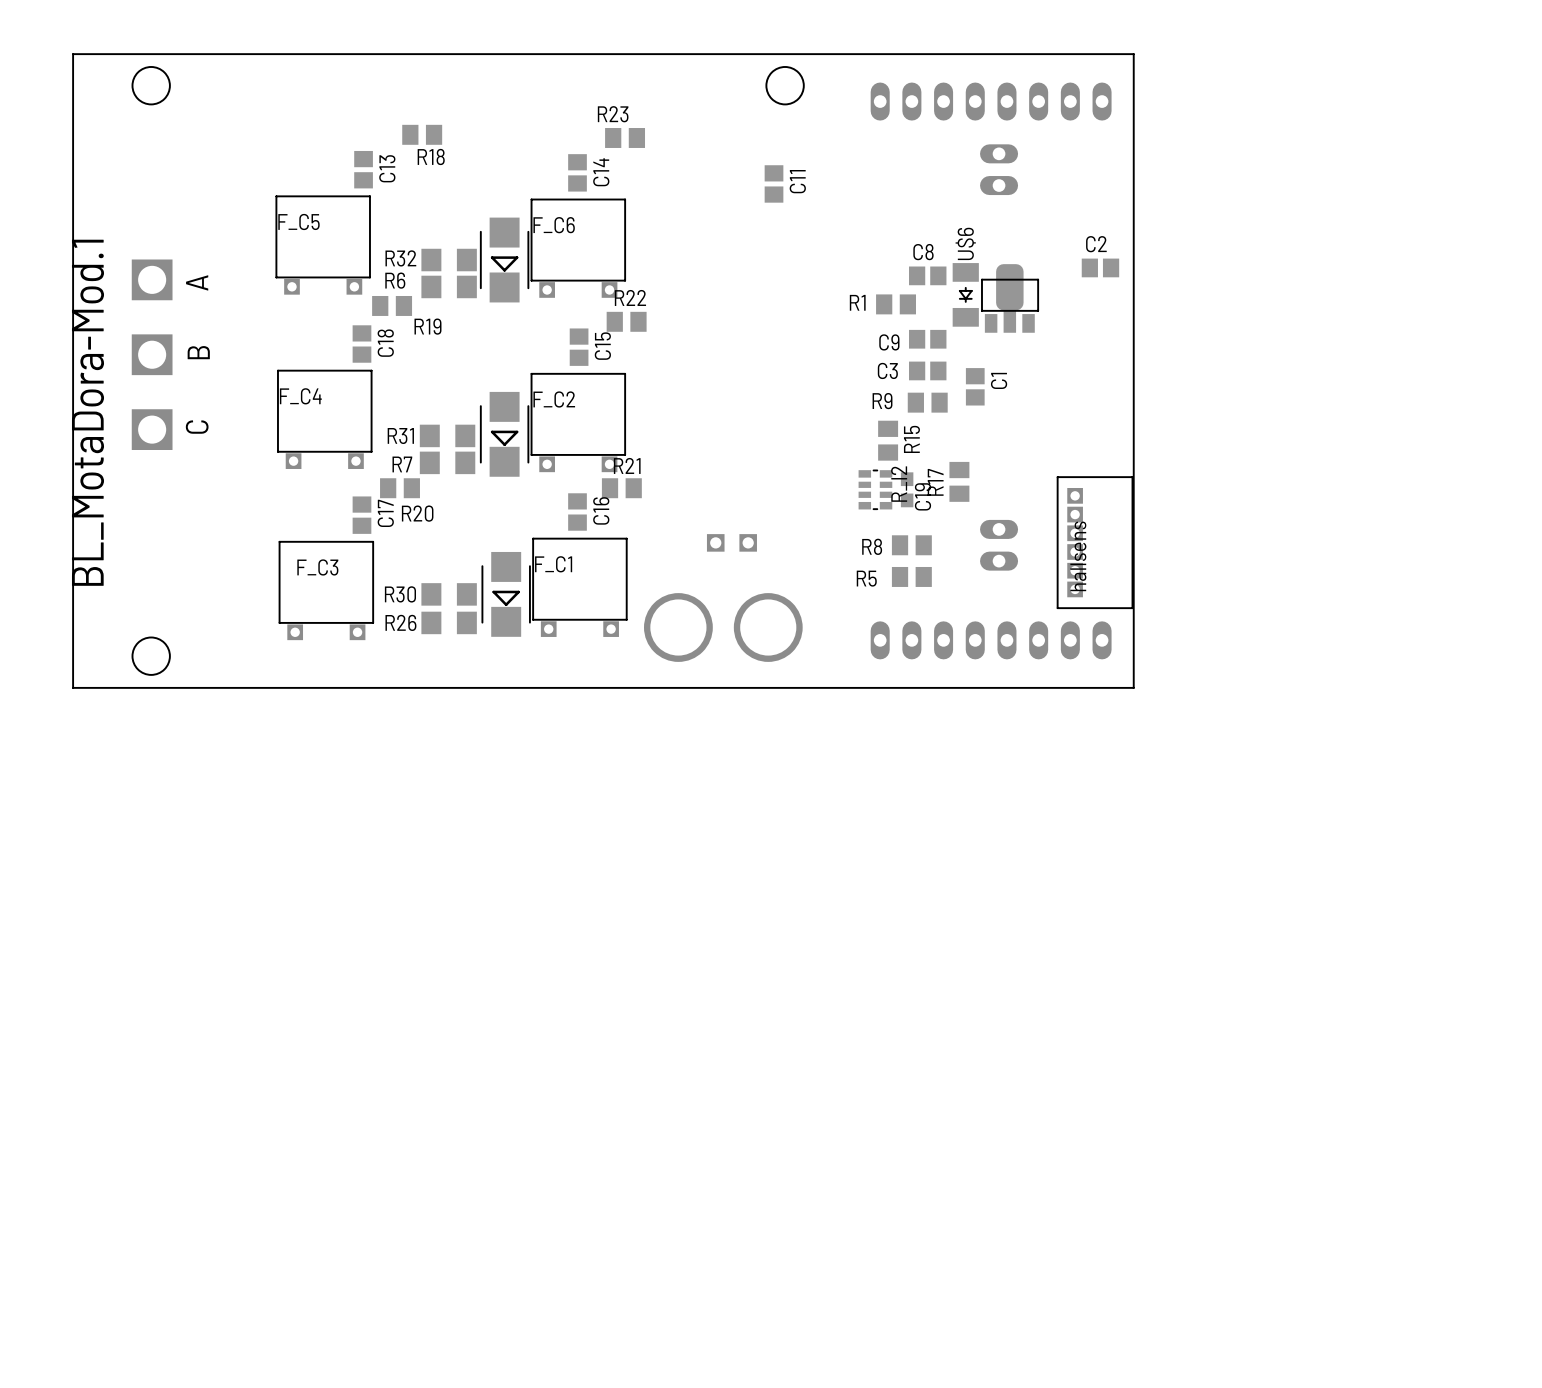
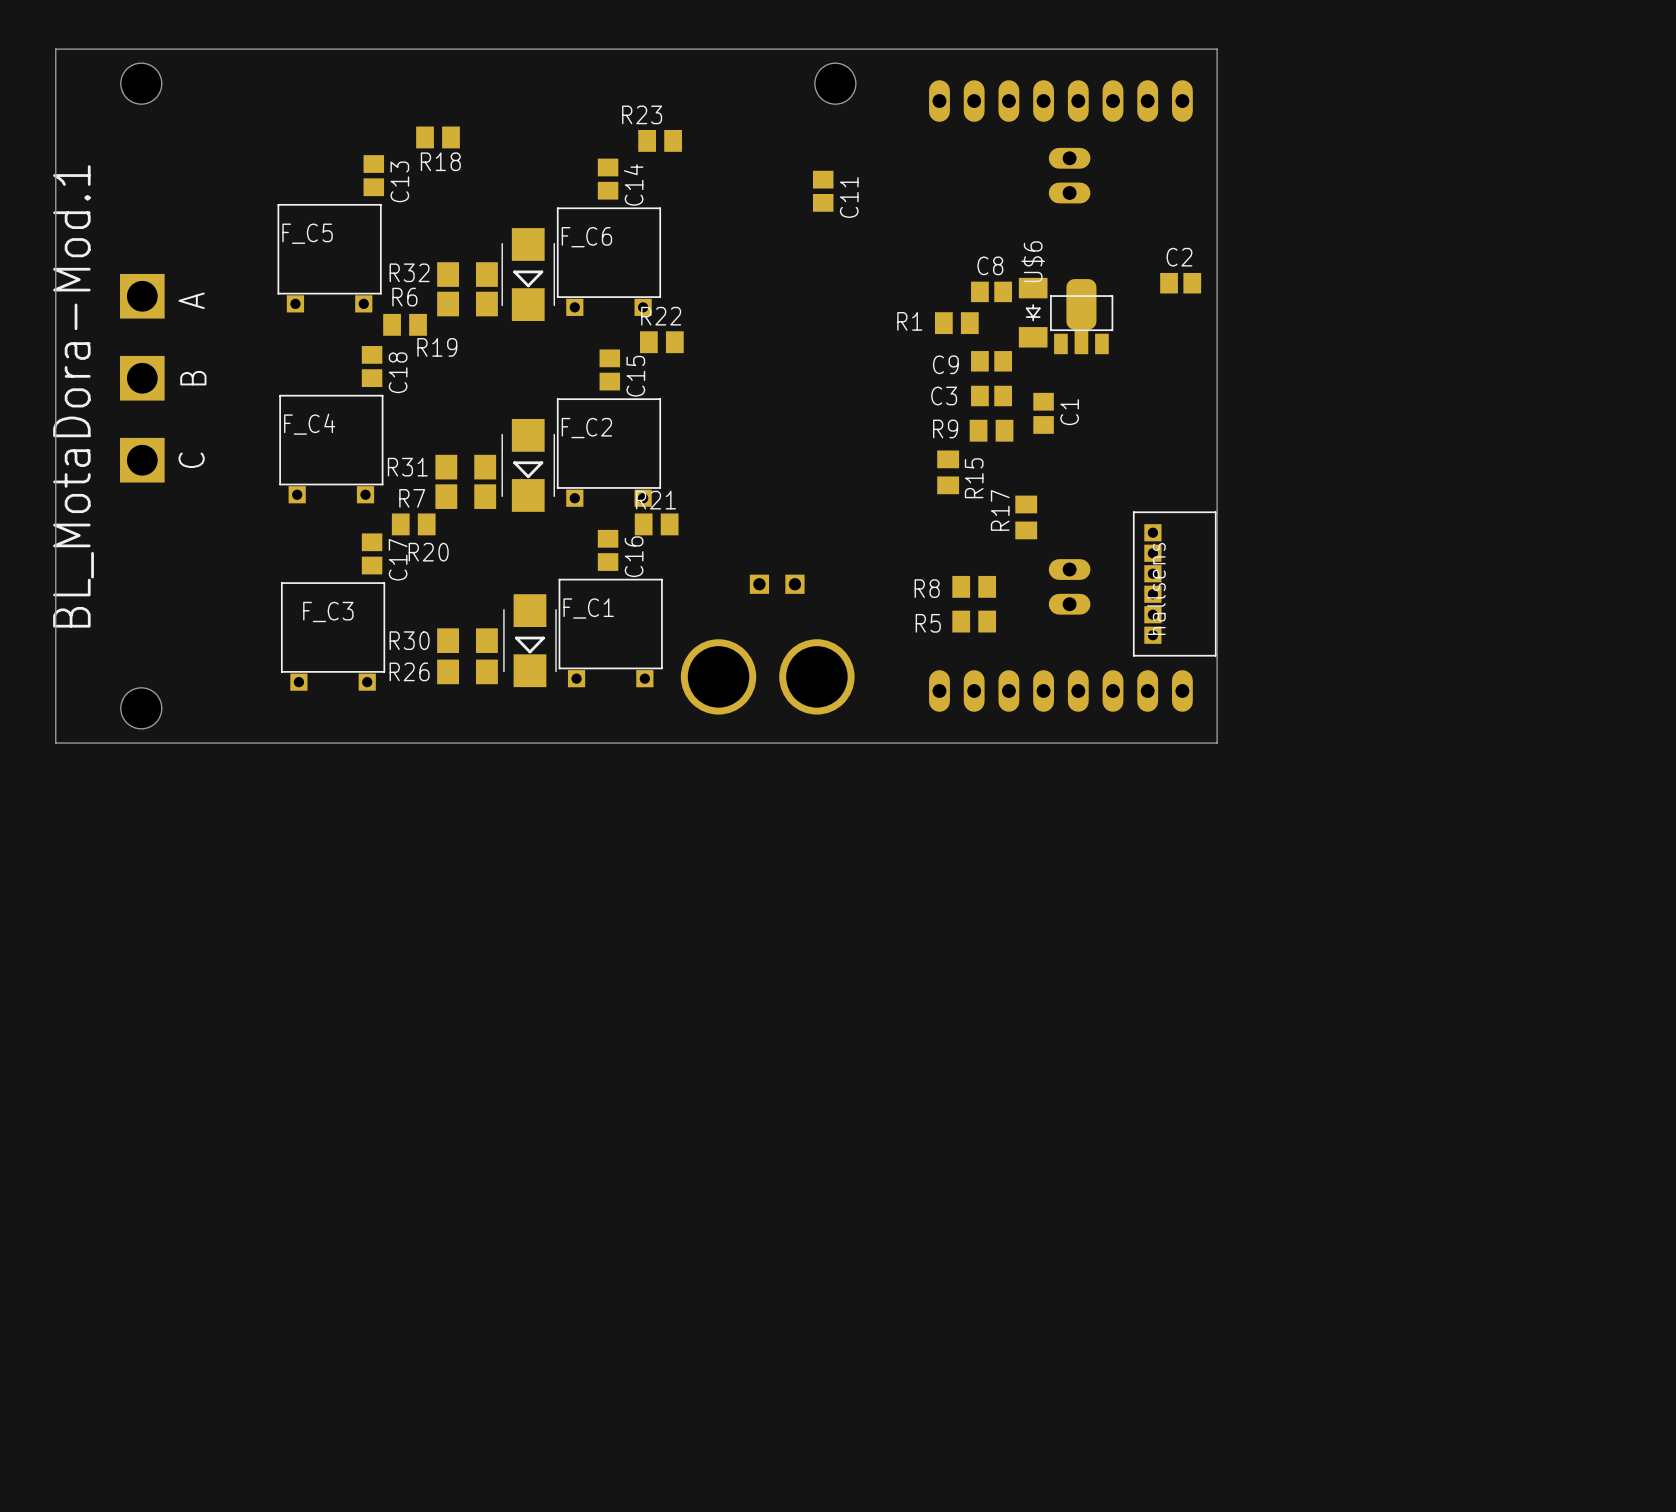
R_I2: (875, 489) -> none
C19: (907, 489) -> none

